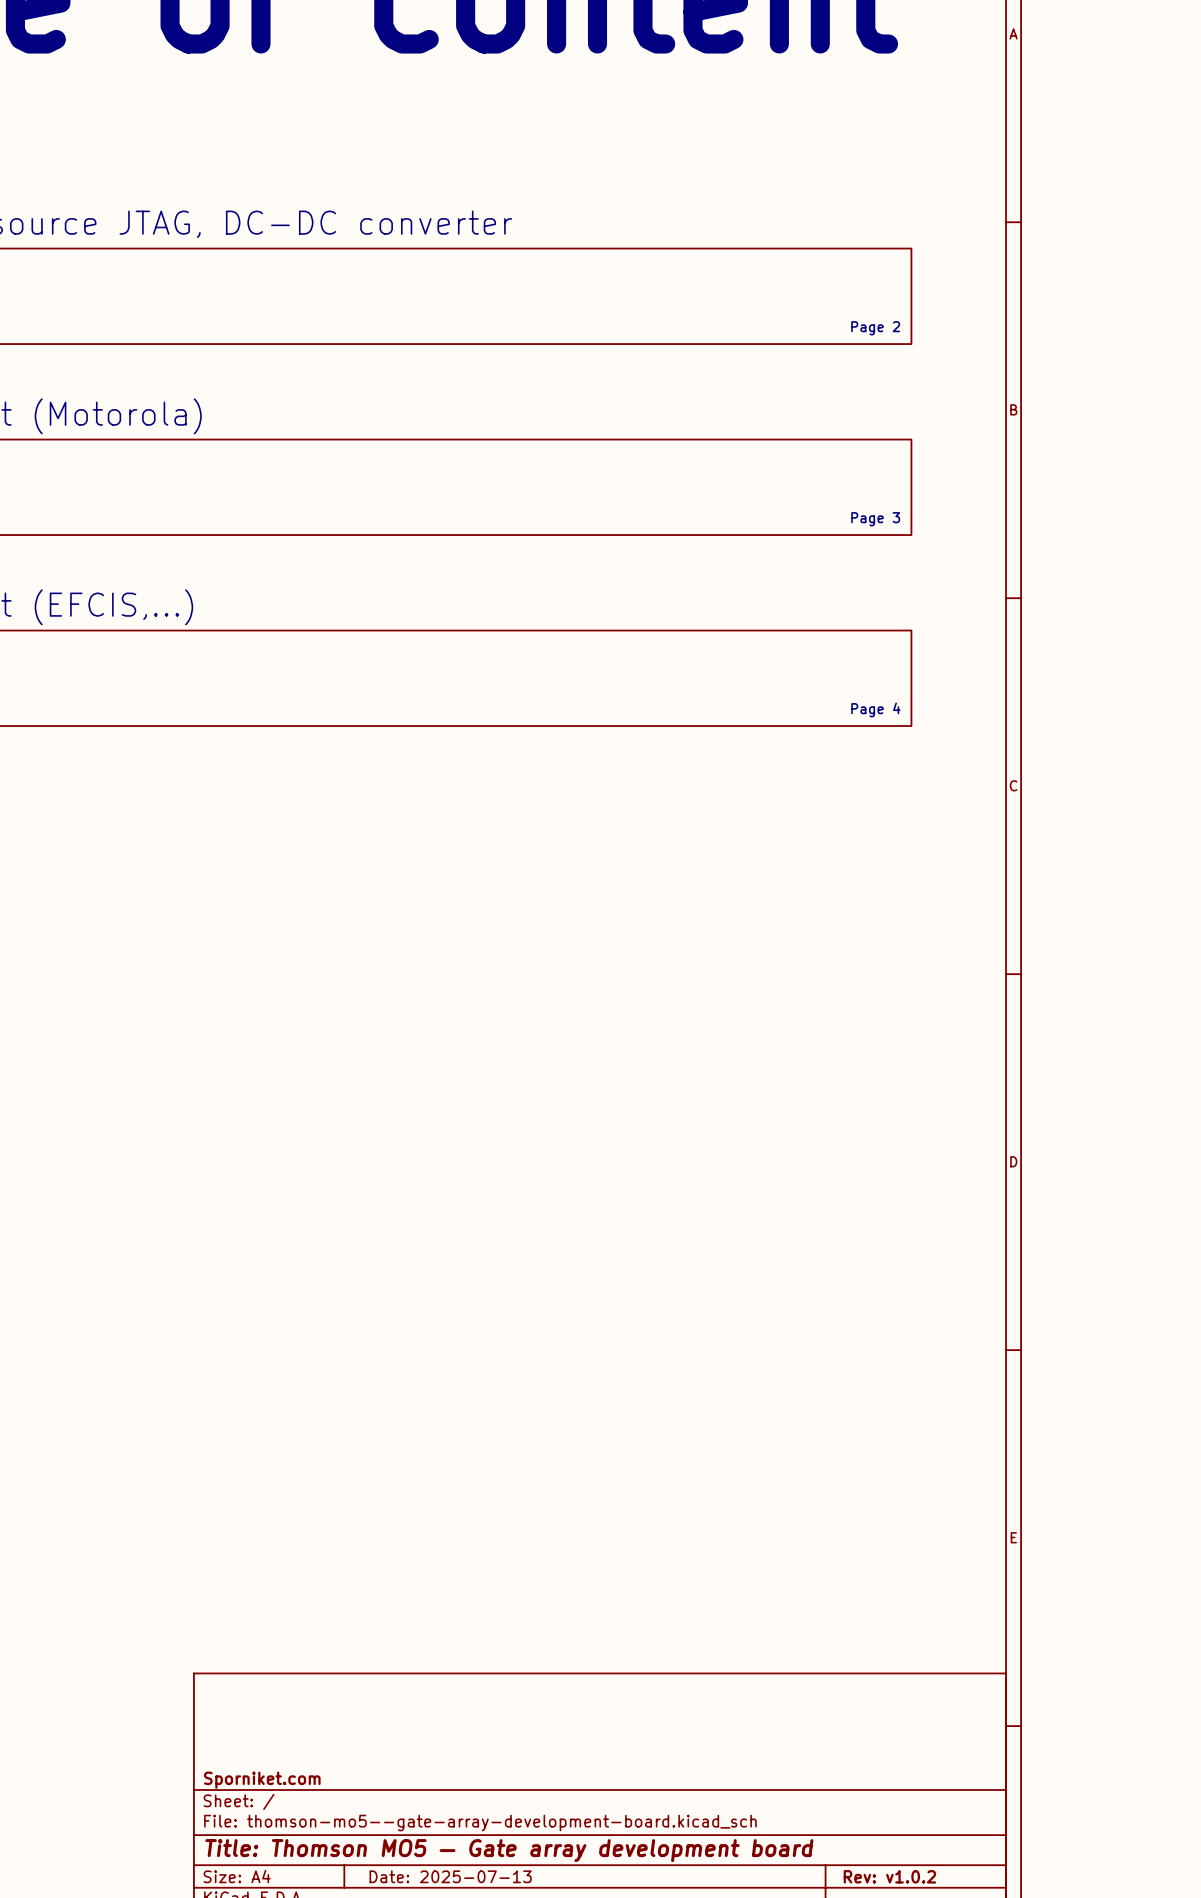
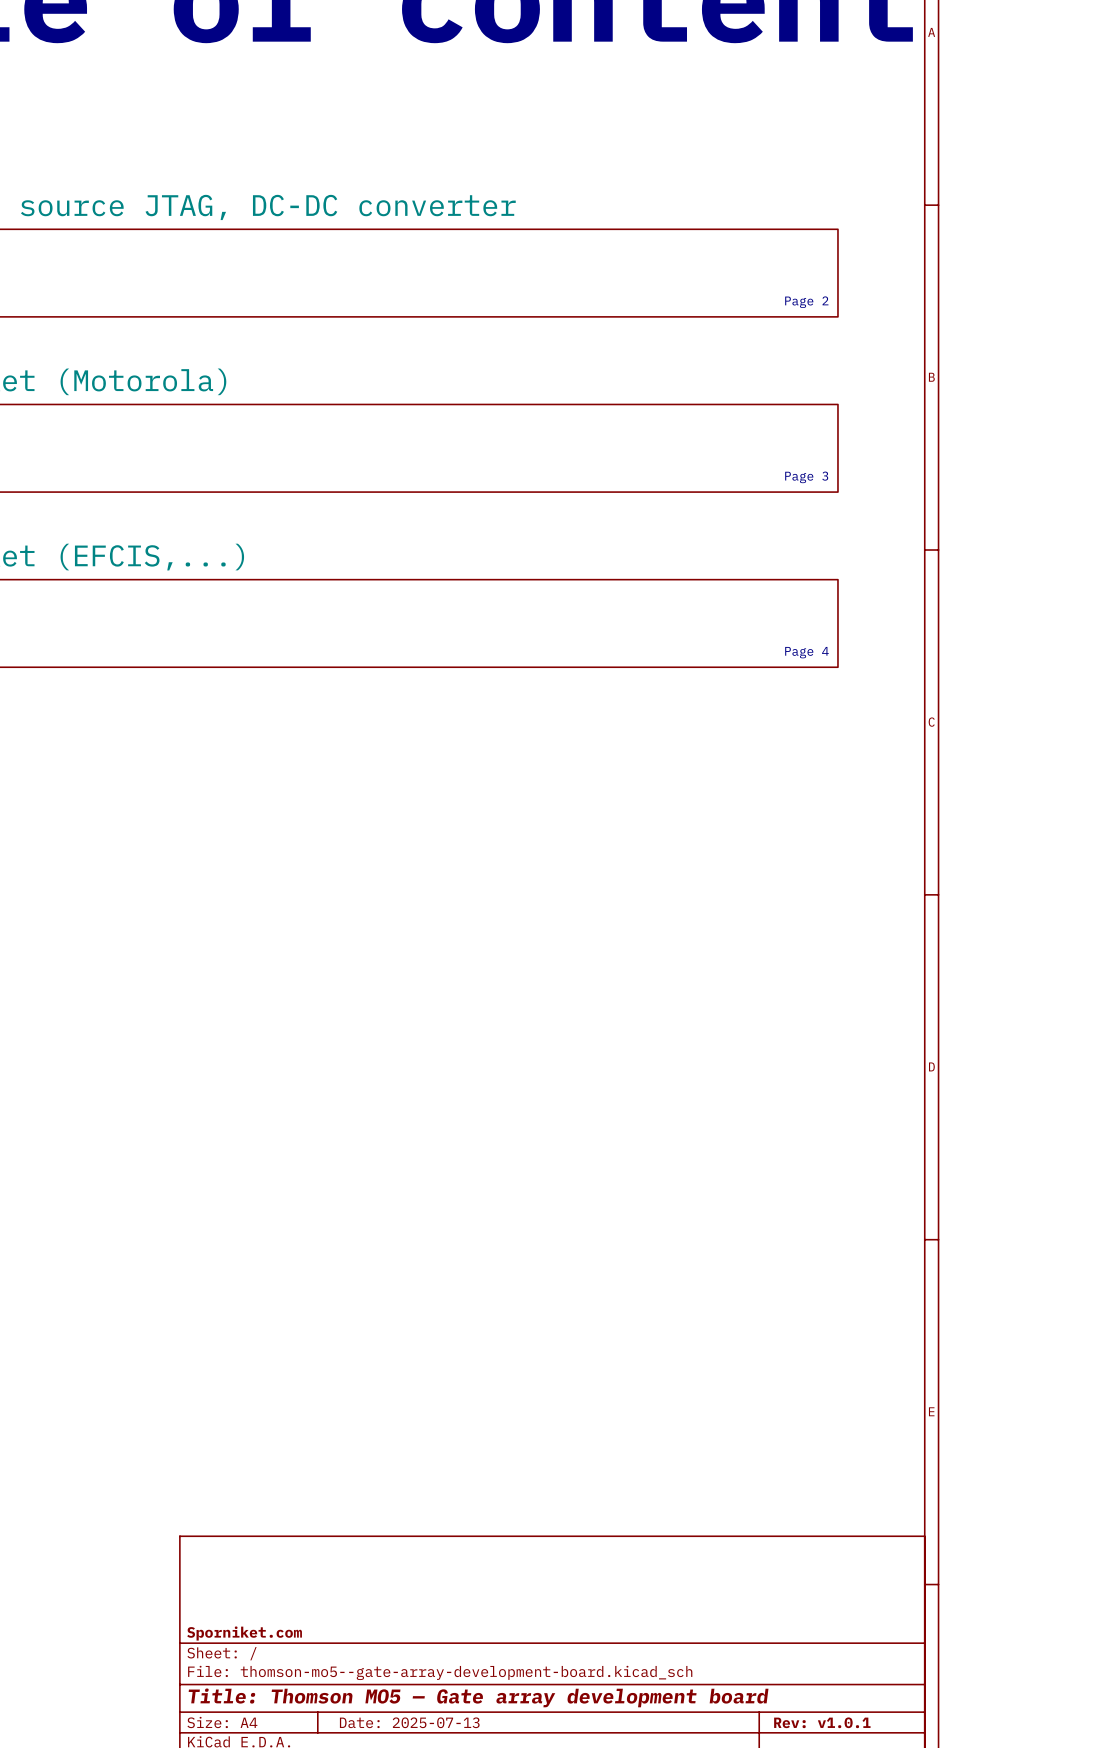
title block: Rev: v1.0.2 (889, 1876) -> Rev: v1.0.1 (822, 1722)

